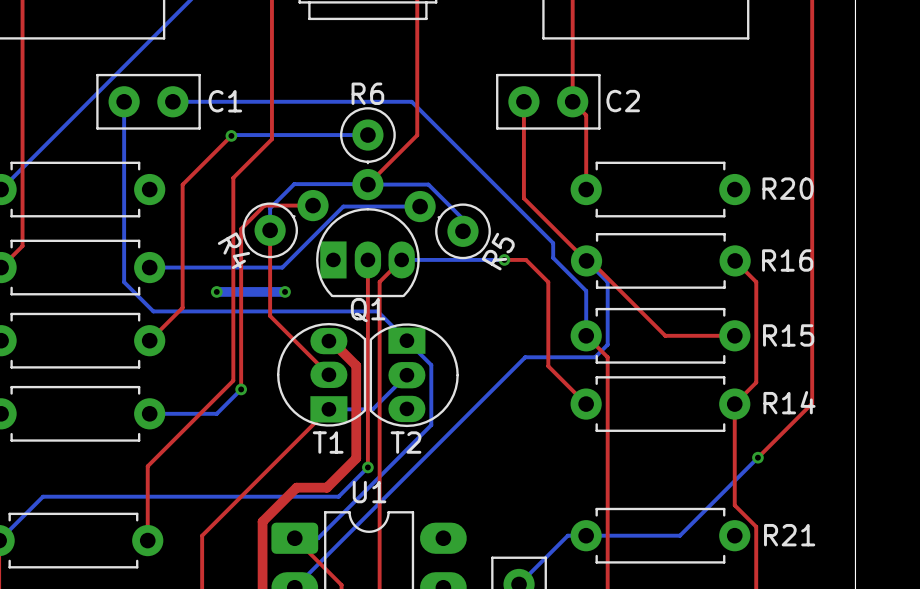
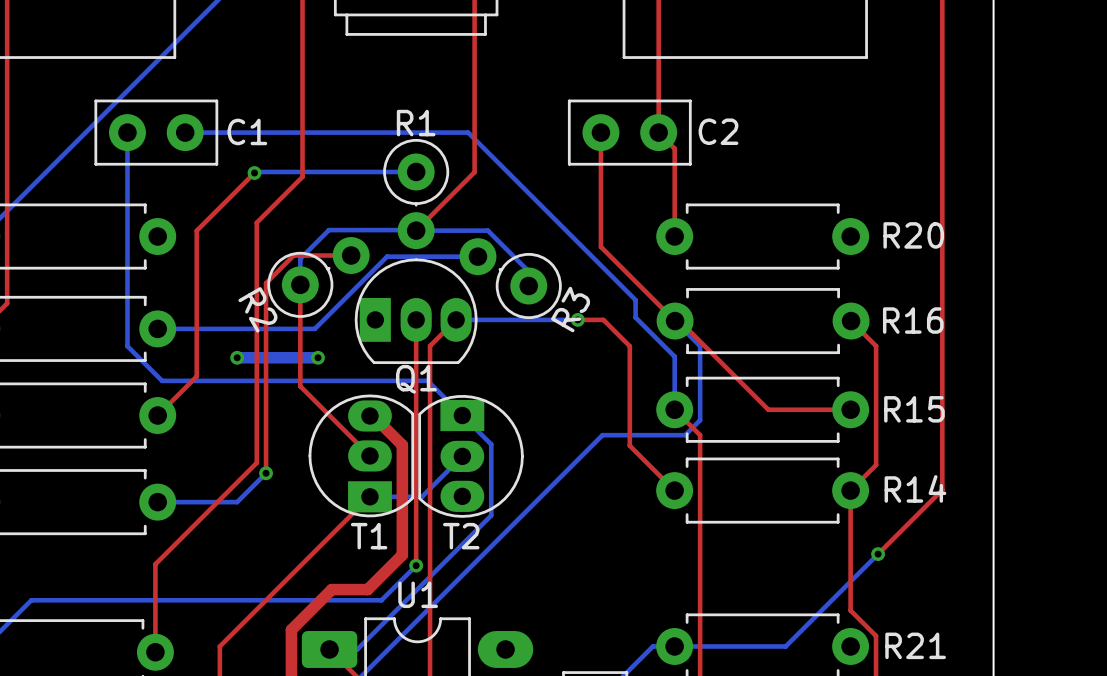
R6 name: R6 (367, 93) -> R1 (416, 123)
R4 name: R4 (233, 250) -> R2 (257, 309)
R5 name: R5 (498, 251) -> R3 (570, 309)

